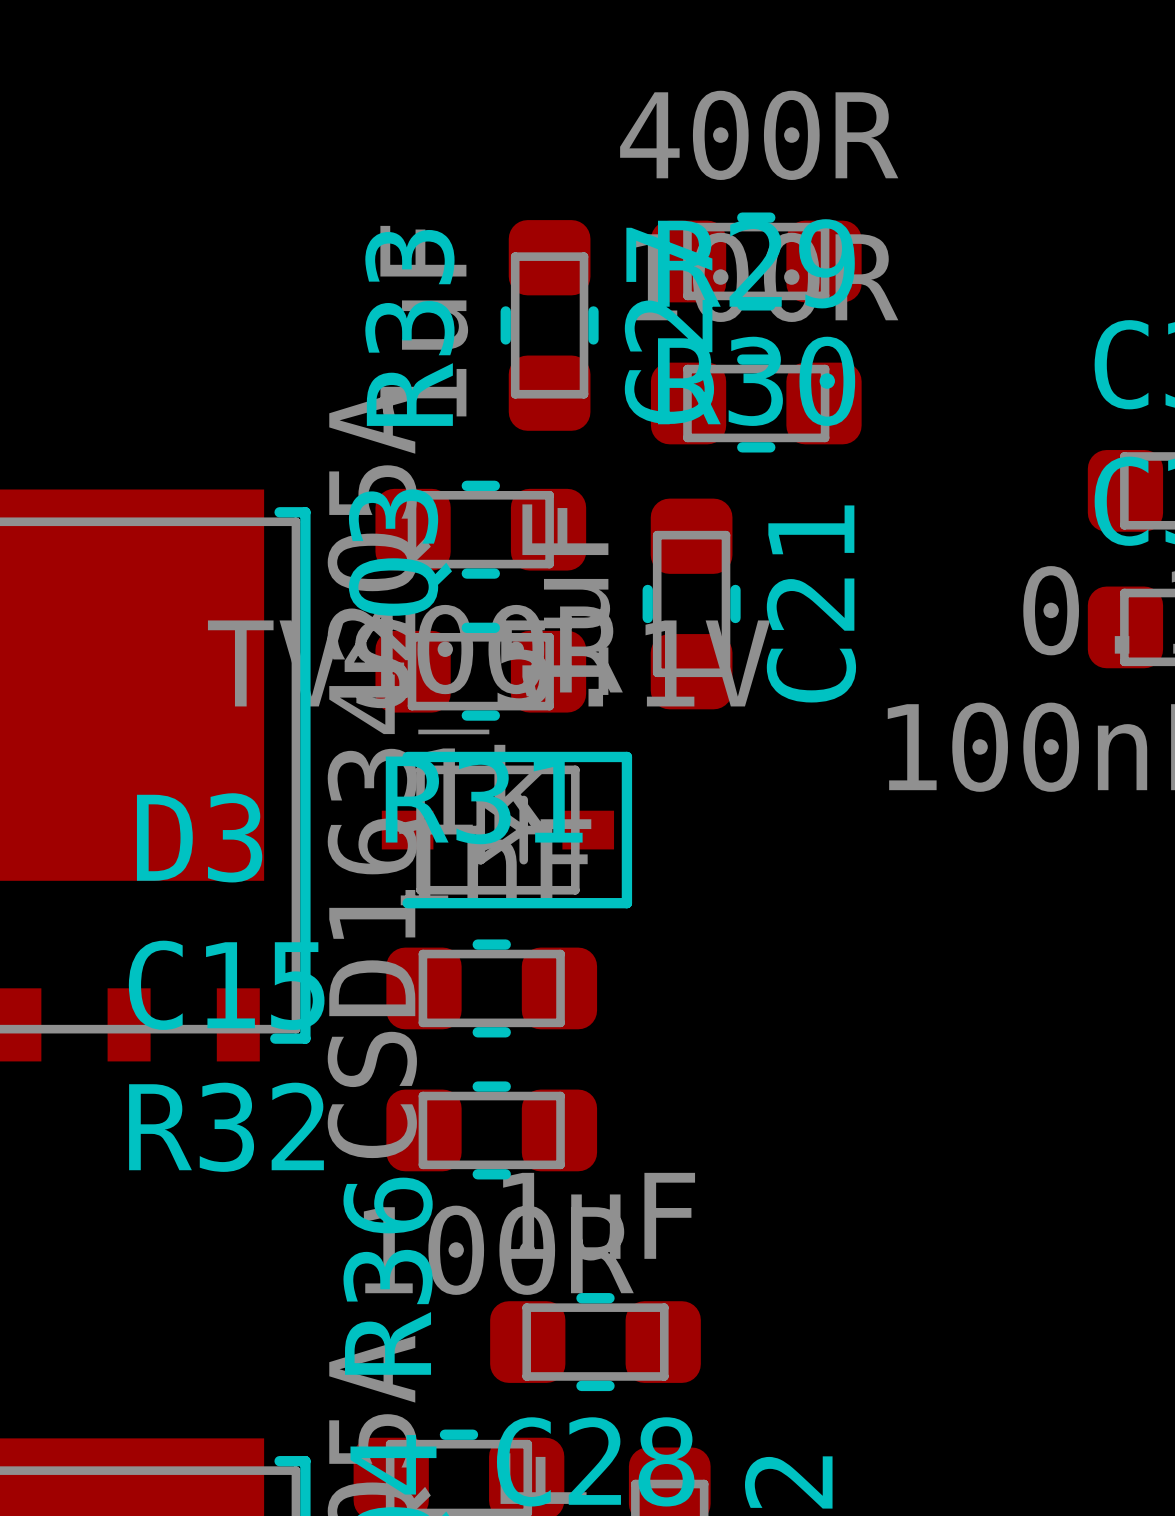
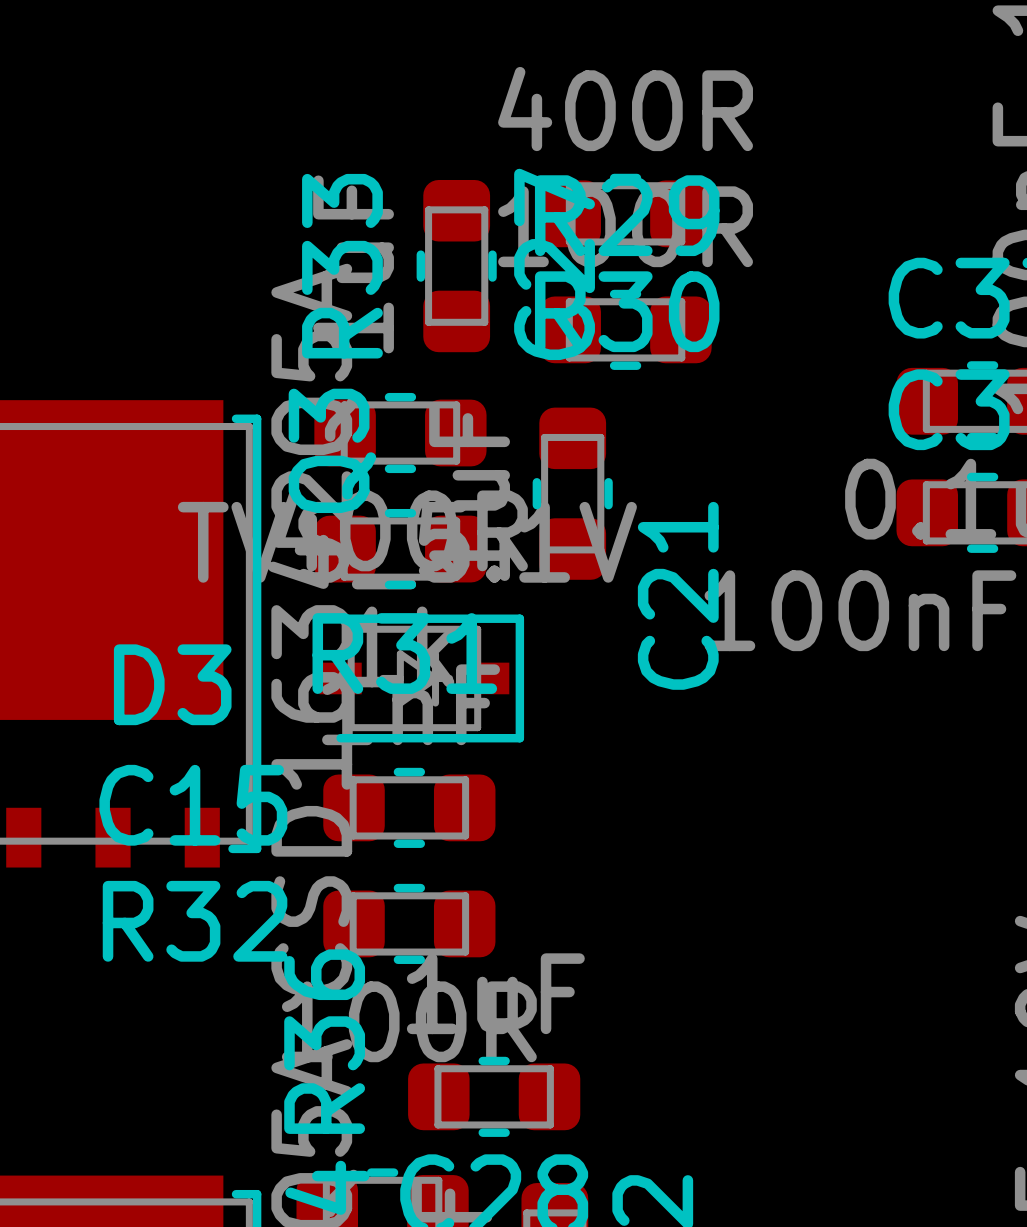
C21 name position: C21 (811, 603) -> C21 (678, 595)

